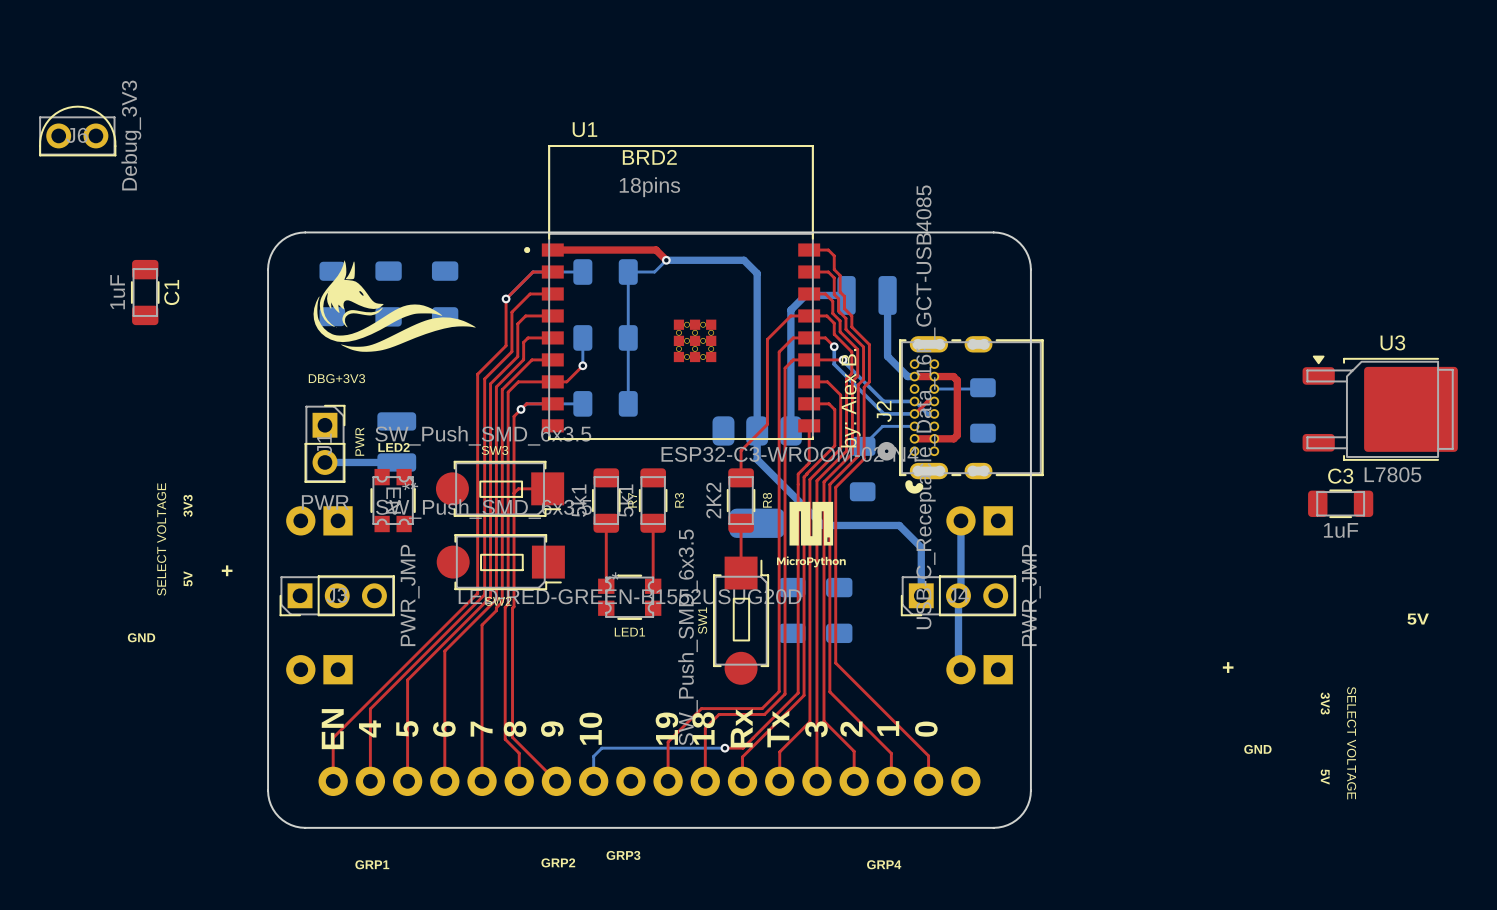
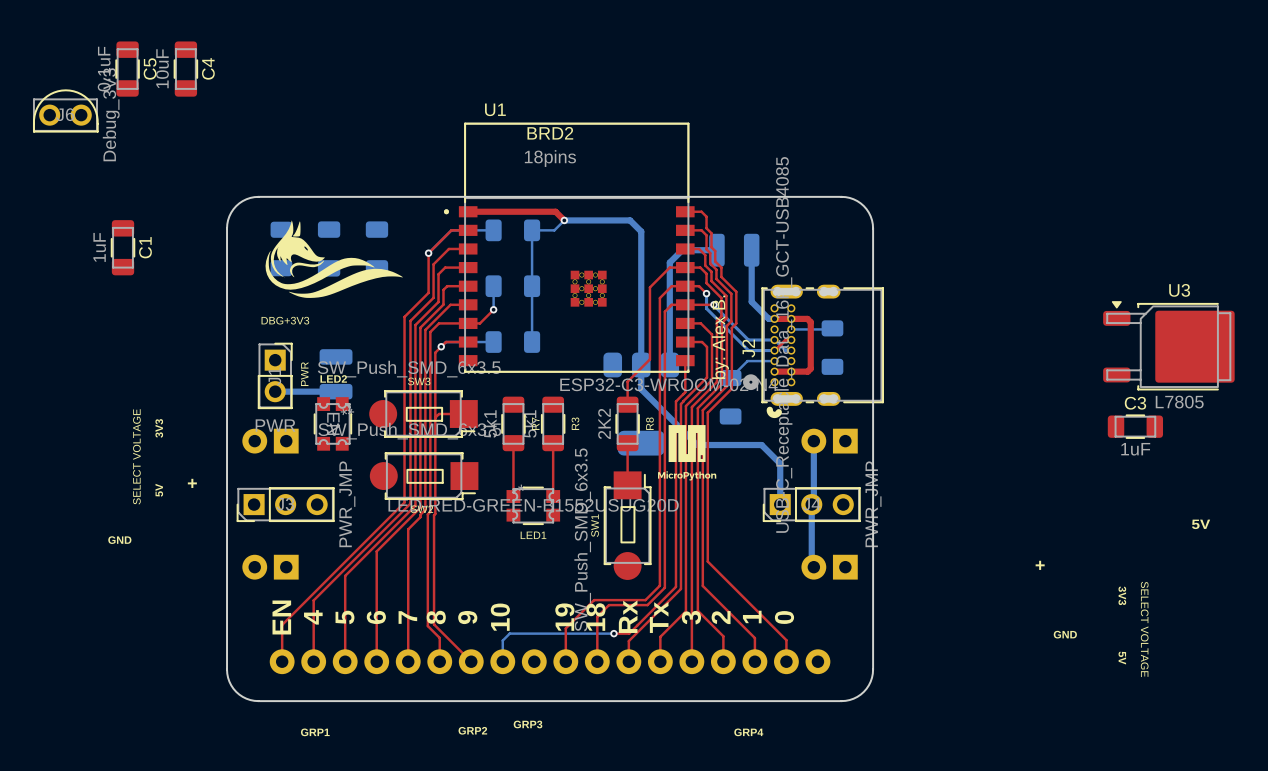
C5: none -> 0.1uF (127, 69)
C4: none -> 10uF (185, 69)
part: (792, 610) -> none
part: (839, 610) -> none

